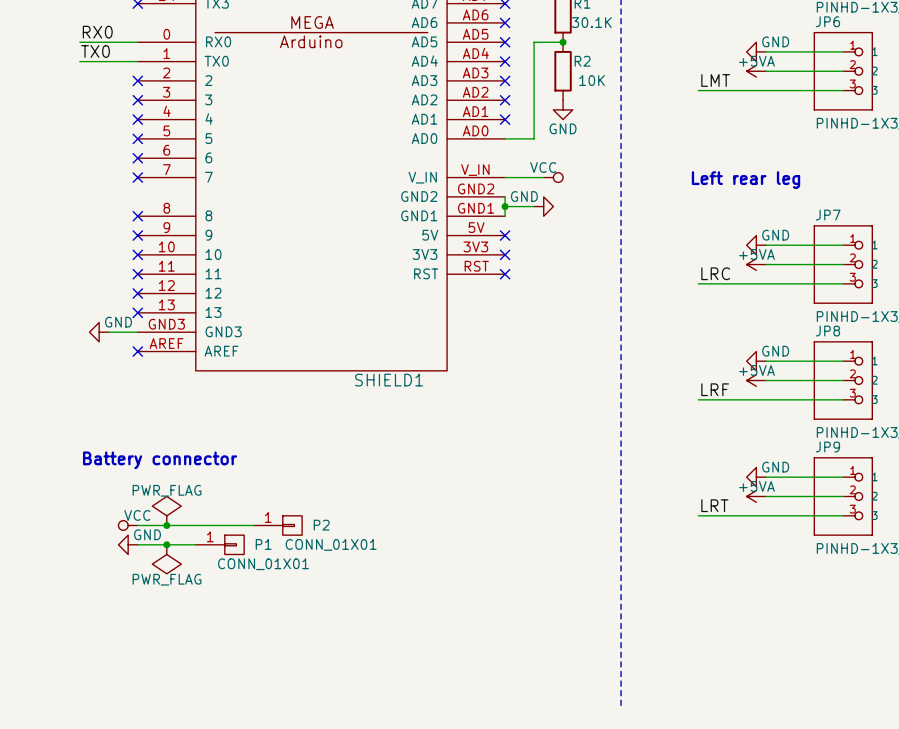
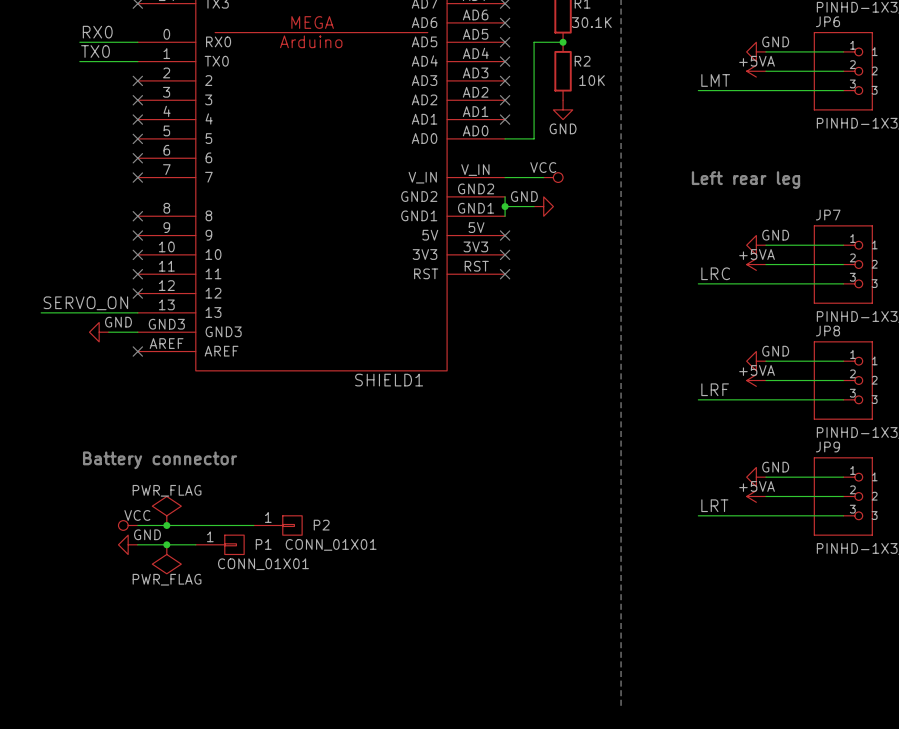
label: none -> SERVO_ON (85, 303)
wire: none -> (41, 312) (137, 312)
no-connect mark: (137, 312) -> none

